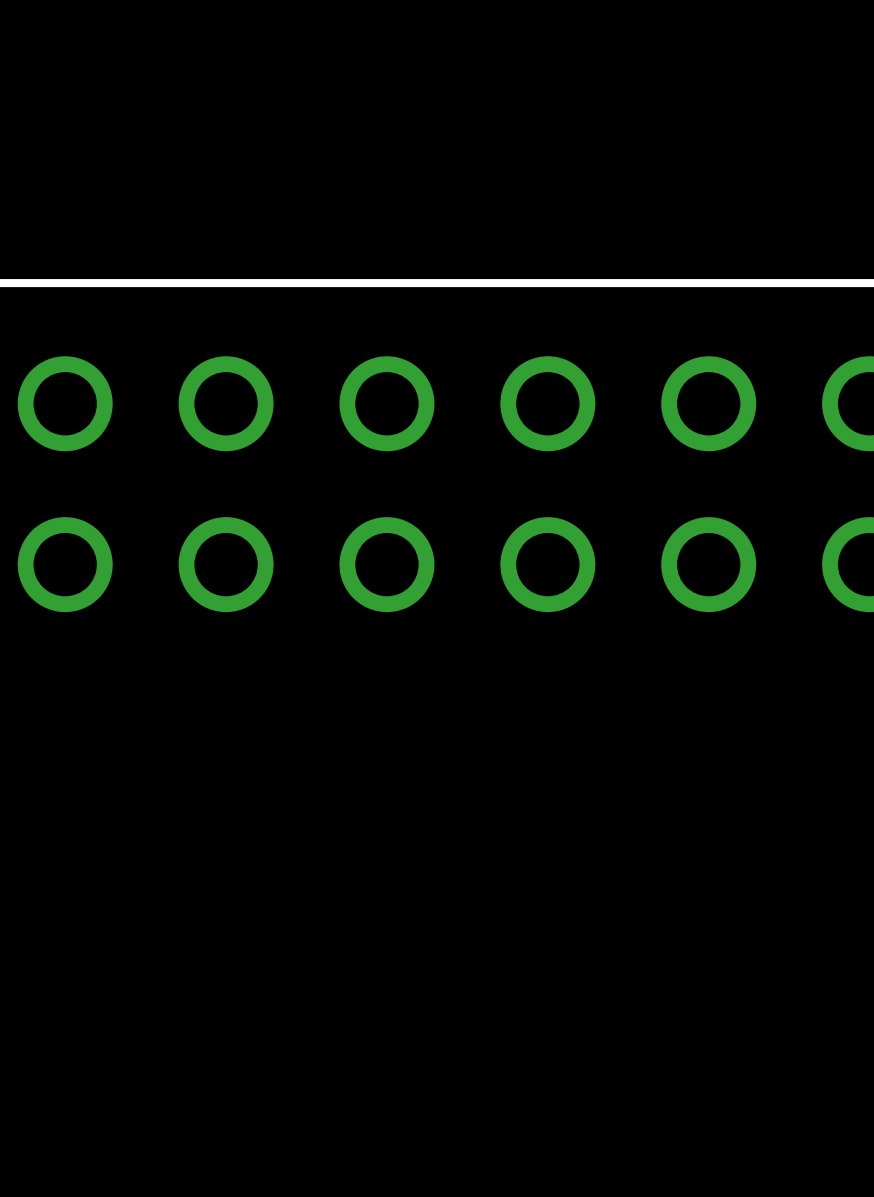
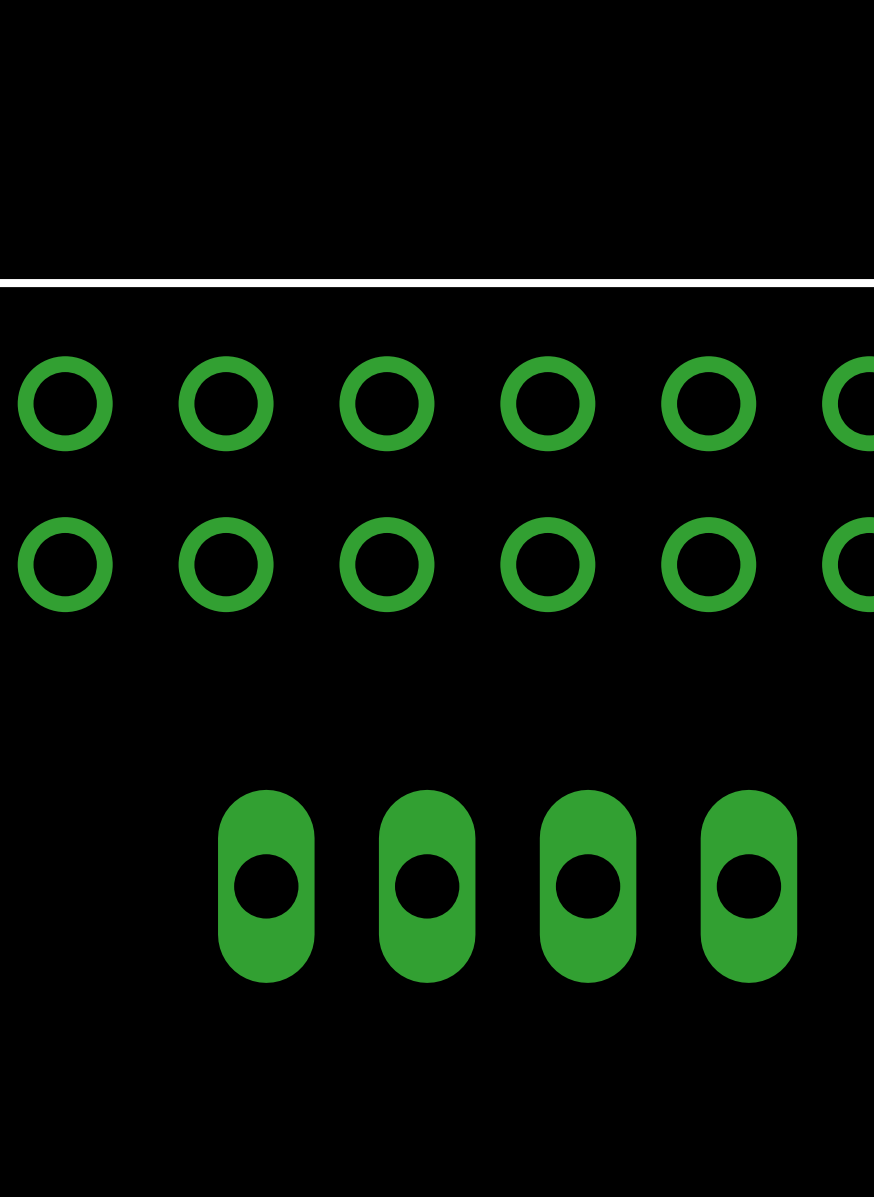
part: none -> (507, 886)

